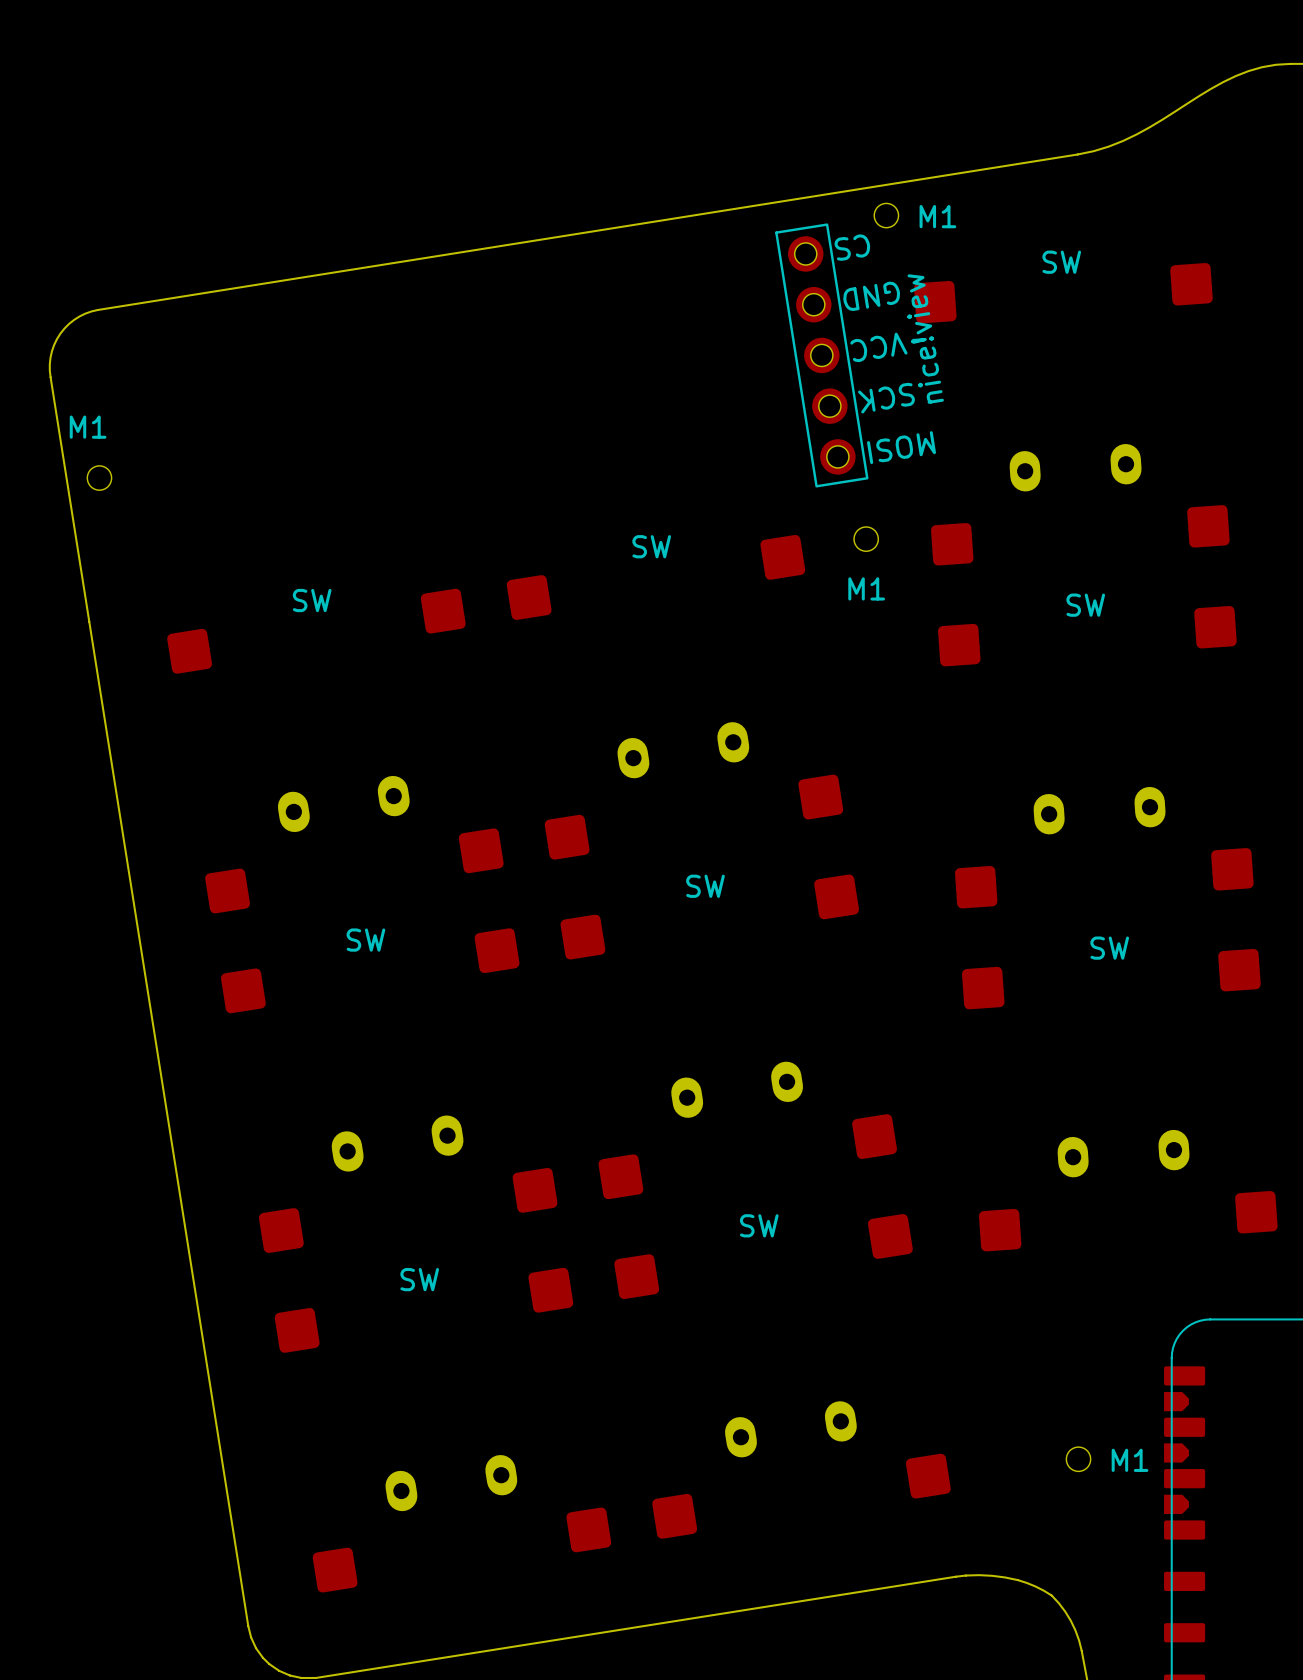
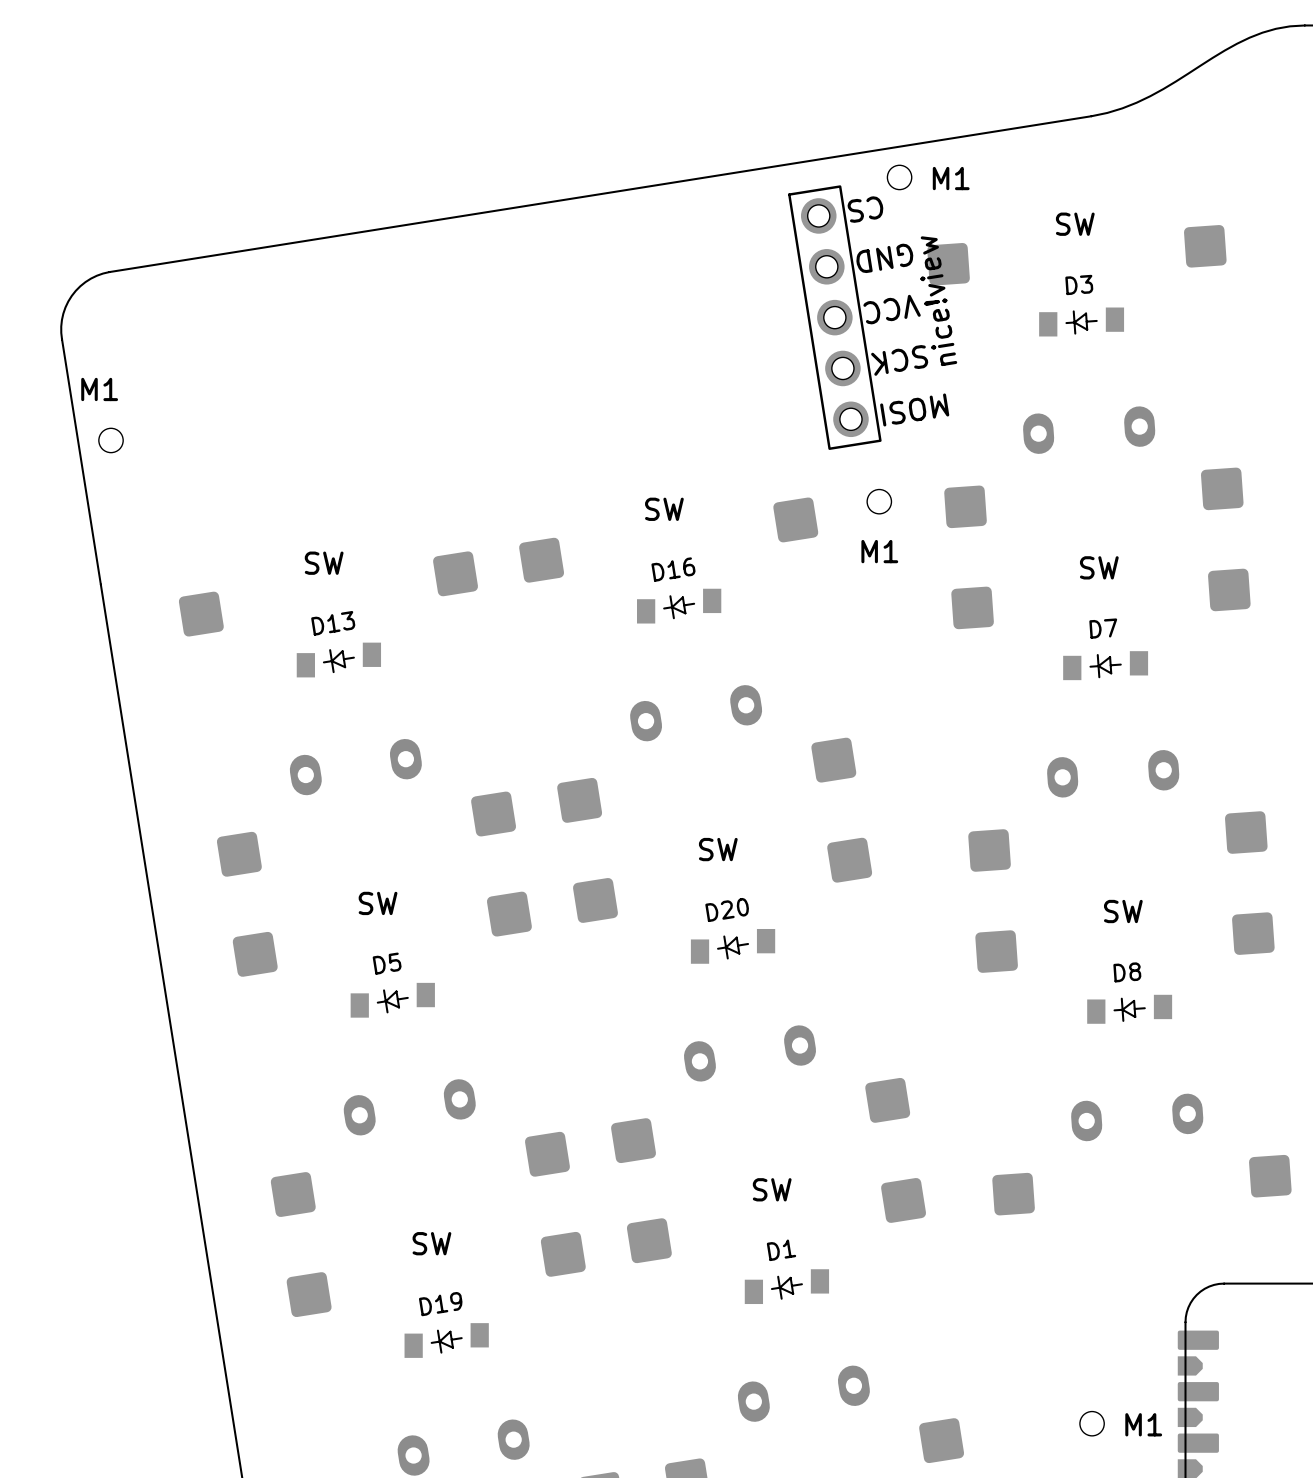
D3: none -> (1081, 321)
D16: none -> (679, 606)
D13: none -> (338, 660)
D7: none -> (1105, 665)
D20: none -> (733, 946)
D5: none -> (392, 1000)
D8: none -> (1129, 1009)
D1: none -> (786, 1286)
D19: none -> (446, 1340)

